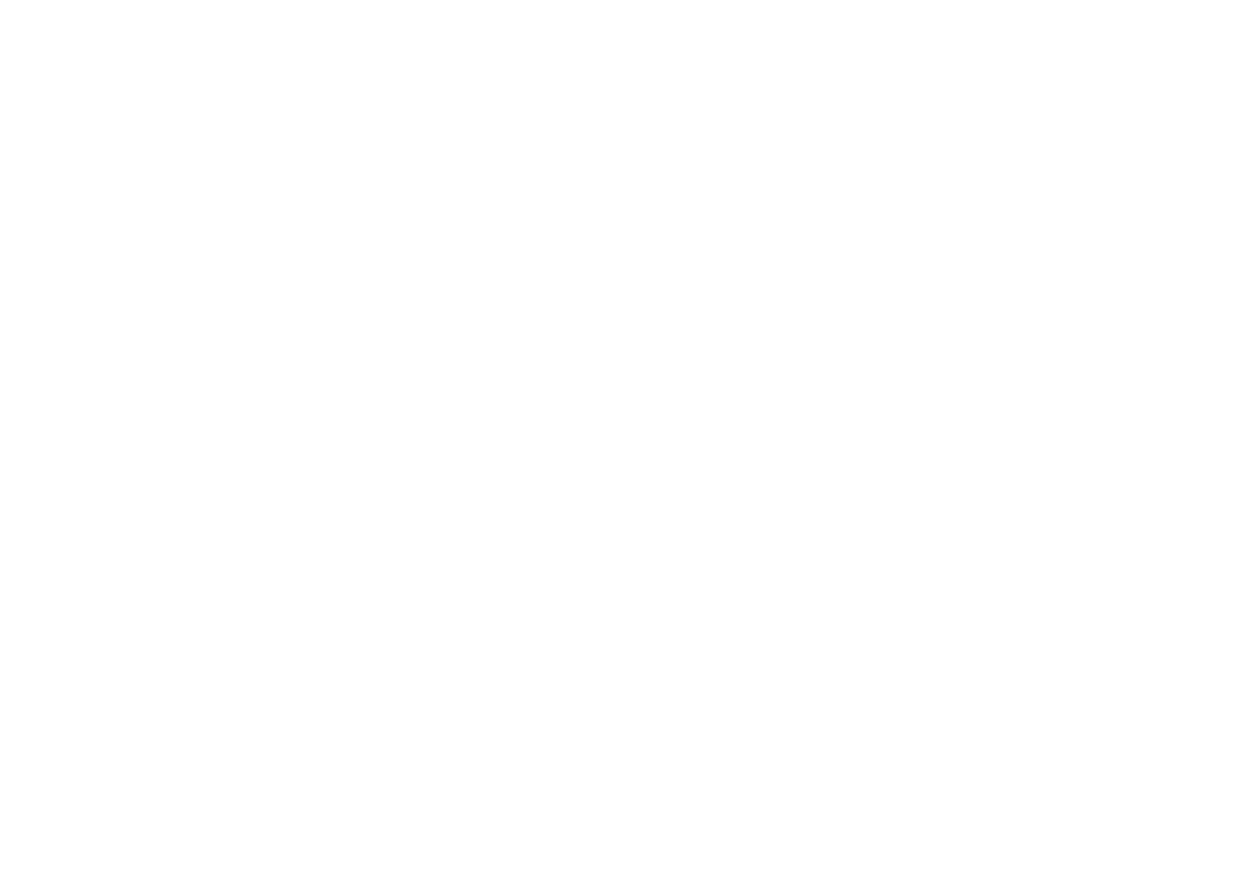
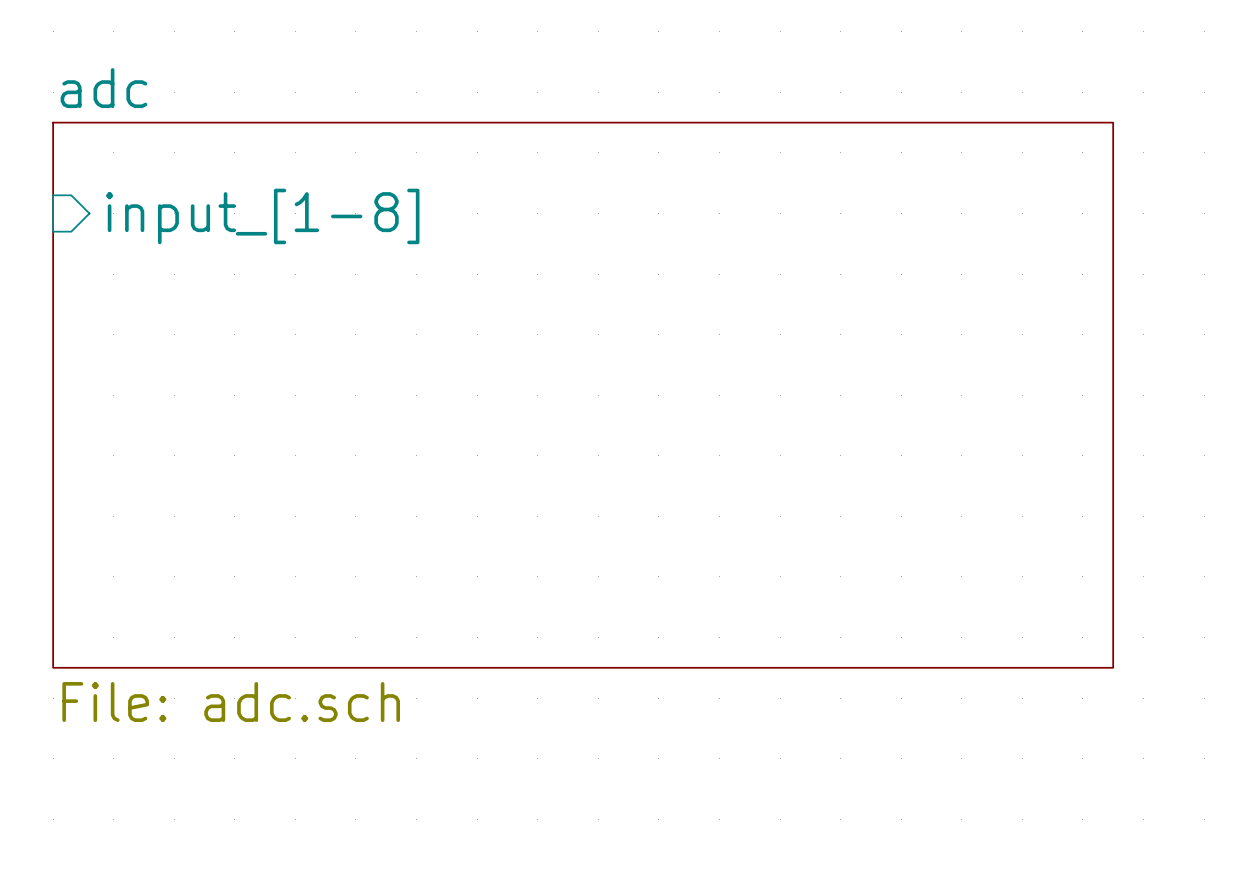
sheet pin: none -> input_[1-8] (262, 216)
sheet adc: none -> File: adc.sch (583, 395)

